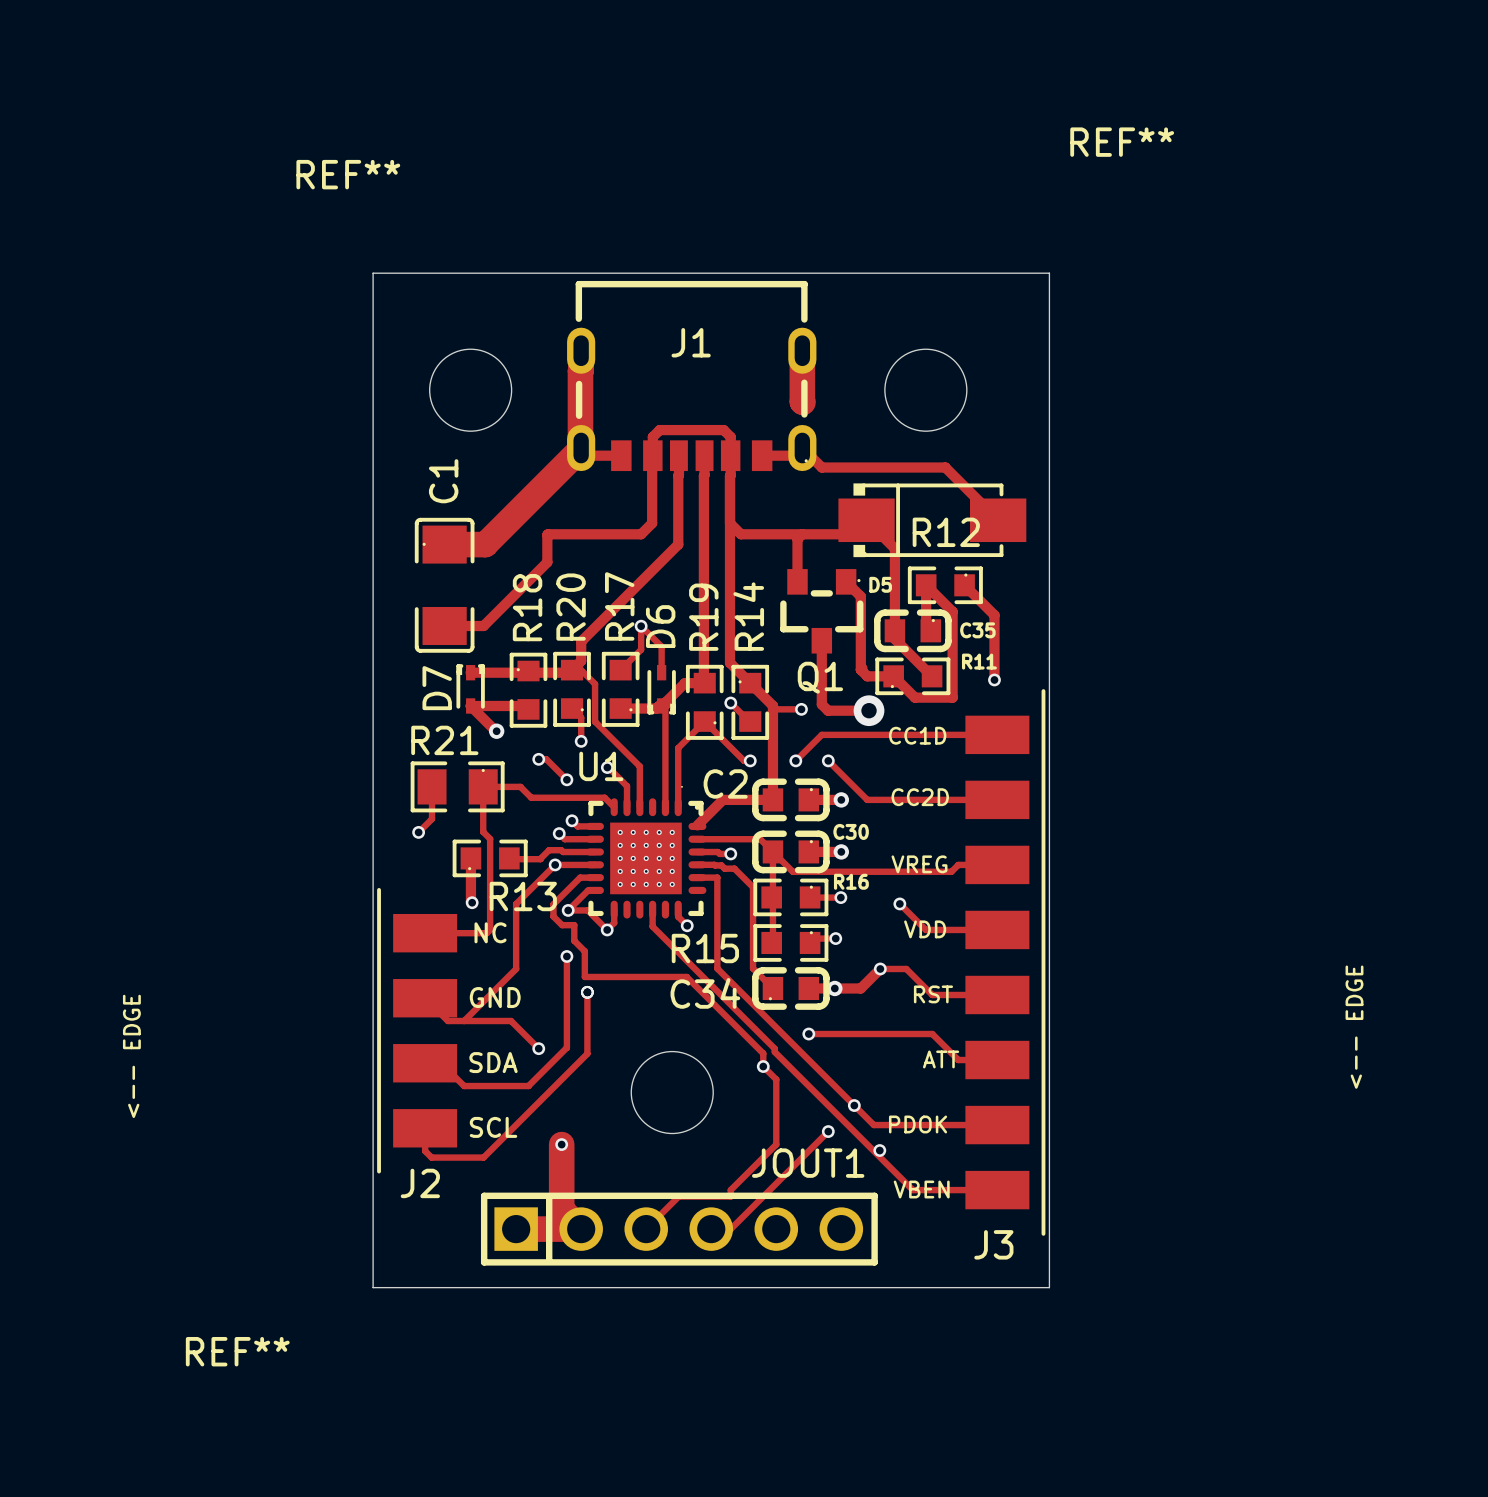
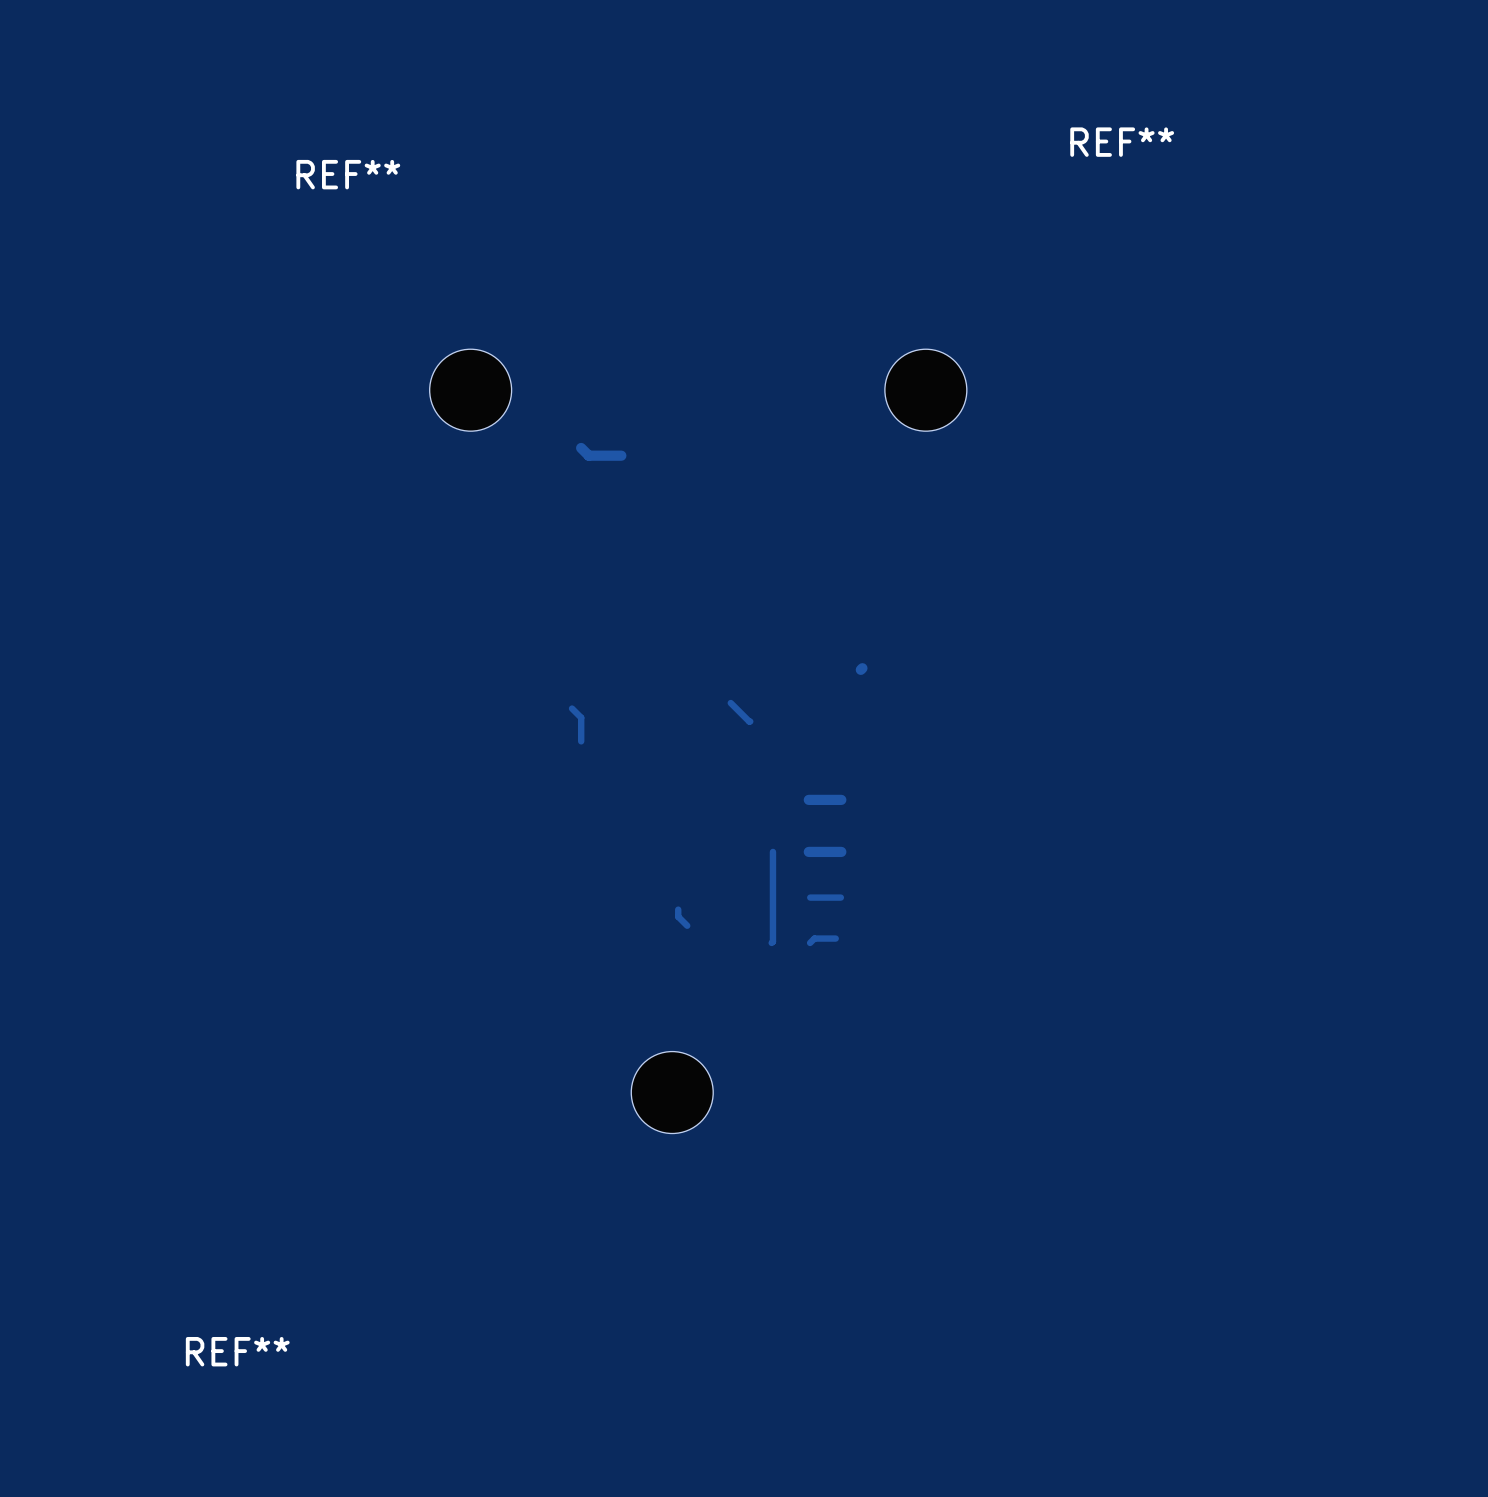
board edge: (373, 273) (1049, 273) (1049, 1287) (373, 1287) (373, 273) -> none
track: (581, 350) (580, 449) (485, 544) (444, 544) -> none
J1: (691, 376) -> none
track: (802, 402) (802, 401) (802, 350) (802, 370) (809, 377) (809, 403) -> none
track: (678, 455) (678, 544) (581, 641) (581, 660) (569, 672) (470, 672) -> none
track: (704, 455) (704, 683) (684, 683) (664, 705) (659, 705) (656, 708) (620, 708) -> none
track: (762, 455) (794, 455) (802, 448) (821, 467) (945, 467) (998, 520) -> none
D5: (932, 520) -> none
track: (730, 523) (741, 534) (859, 534) -> none
track: (802, 534) (797, 539) (797, 581) -> none
track: (860, 534) (880, 534) (894, 548) (894, 639) (932, 676) -> none
track: (846, 581) (860, 596) (860, 669) (867, 676) (893, 676) (914, 697) (952, 697) (952, 611) (926, 585) (926, 626) (930, 630) -> none
C1: (444, 585) -> none
R12: (945, 585) -> none
track: (963, 586) (994, 615) (994, 679) -> none
Q1: (821, 611) -> none
track: (444, 626) (483, 626) (547, 562) (548, 534) (641, 534) (652, 523) (652, 437) (659, 430) (723, 430) (730, 437) (730, 662) (772, 705) -> none
via: (641, 626) -> none
C35: (912, 630) -> none
track: (821, 640) (821, 704) (828, 710) (869, 710) -> none
track: (572, 670) (581, 670) (595, 684) (595, 721) (639, 766) (639, 807) -> none
track: (620, 670) (641, 649) (641, 626) (661, 646) (661, 672) -> none
R11: (912, 676) -> none
via: (994, 679) -> none
D7: (470, 688) -> none
R20: (572, 689) -> none
R17: (620, 689) -> none
D6: (661, 689) -> none
R18: (528, 690) -> none
R19: (704, 702) -> none
R14: (750, 702) -> none
via: (730, 703) -> none
track: (772, 705) (772, 799) (722, 799) (697, 825) -> none
track: (772, 705) (776, 709) (801, 709) -> none
track: (665, 706) (665, 807) -> none
track: (528, 709) (525, 705) (470, 705) (496, 731) -> none
via: (801, 709) -> none
via: (869, 710) -> none
via: (496, 731) -> none
track: (997, 734) (821, 734) (795, 760) -> none
via: (581, 741) -> none
track: (538, 759) (546, 759) (566, 779) -> none
via: (538, 759) -> none
track: (750, 760) (744, 760) (704, 721) (678, 748) (678, 807) -> none
via: (750, 760) -> none
via: (795, 760) -> none
track: (828, 760) (867, 799) (997, 799) -> none
via: (828, 760) -> none
track: (607, 767) (627, 786) (627, 807) -> none
via: (607, 767) -> none
via: (566, 779) -> none
track: (432, 786) (432, 818) (418, 832) -> none
R21: (457, 786) -> none
C2: (790, 799) -> none
via: (841, 799) -> none
track: (614, 807) (604, 797) (531, 797) (520, 786) (483, 786) (483, 832) (490, 838) (490, 929) (486, 933) (425, 933) -> none
track: (572, 820) (577, 826) (595, 826) -> none
via: (572, 820) -> none
via: (418, 832) -> none
via: (620, 832) -> none
via: (633, 832) -> none
via: (646, 832) -> none
via: (659, 832) -> none
via: (672, 832) -> none
track: (559, 833) (564, 839) (595, 839) -> none
via: (559, 833) -> none
track: (697, 839) (760, 839) (792, 871) (951, 871) (958, 864) (997, 864) -> none
via: (620, 845) -> none
via: (633, 845) -> none
via: (646, 845) -> none
via: (659, 845) -> none
via: (672, 845) -> none
C30: (790, 851) -> none
via: (841, 851) -> none
track: (595, 852) (549, 850) (540, 858) -> none
U1: (646, 852) -> none
track: (697, 852) (730, 853) -> none
via: (730, 853) -> none
track: (470, 858) (472, 902) -> none
R13: (490, 858) -> none
track: (509, 858) (540, 859) -> none
via: (620, 858) -> none
via: (633, 858) -> none
via: (646, 858) -> none
via: (659, 858) -> none
via: (672, 858) -> none
via: (555, 864) -> none
track: (594, 864) (555, 864) (516, 903) (516, 968) (464, 1021) -> none
track: (697, 864) (721, 865) (724, 868) (734, 868) (753, 887) (753, 968) (772, 988) -> none
via: (620, 871) -> none
via: (633, 871) -> none
via: (646, 871) -> none
via: (659, 871) -> none
via: (672, 871) -> none
track: (595, 877) (580, 877) (553, 904) (553, 916) (562, 925) (574, 925) (574, 940) (584, 951) (584, 976) (686, 976) (763, 1053) (763, 1066) (776, 1079) (776, 1144) (730, 1190) (730, 1196) (678, 1196) (646, 1229) -> none
track: (697, 877) (717, 877) (717, 968) (873, 1125) (997, 1125) -> none
via: (620, 884) -> none
via: (633, 884) -> none
via: (646, 884) -> none
via: (659, 884) -> none
via: (672, 884) -> none
track: (595, 890) (588, 890) (568, 910) (587, 910) (607, 929) (614, 922) (614, 909) -> none
R16: (790, 897) -> none
via: (840, 897) -> none
via: (472, 902) -> none
track: (899, 903) (925, 929) (997, 929) -> none
via: (899, 903) -> none
track: (652, 909) (652, 926) (912, 1190) (997, 1190) -> none
via: (568, 910) -> none
via: (687, 925) -> none
via: (607, 929) -> none
via: (835, 938) -> none
R15: (790, 942) -> none
track: (566, 956) (566, 1047) (528, 1086) (464, 1086) (441, 1063) (425, 1063) -> none
via: (566, 956) -> none
J3: (1005, 962) -> none
via: (880, 968) -> none
C34: (790, 988) -> none
track: (808, 988) (860, 988) (880, 968) (906, 968) (932, 994) (997, 994) -> none
via: (834, 988) -> none
track: (587, 992) (587, 1053) (483, 1157) (431, 1157) (425, 1151) (425, 1128) -> none
via: (587, 992) -> none
track: (425, 998) (447, 1021) (511, 1021) (538, 1048) -> none
J2: (417, 1030) -> none
track: (808, 1034) (932, 1034) (958, 1060) (997, 1060) -> none
via: (808, 1034) -> none
via: (538, 1048) -> none
via: (763, 1066) -> none
via: (854, 1105) -> none
track: (828, 1131) (730, 1229) (711, 1229) -> none
via: (828, 1131) -> none
track: (561, 1144) (561, 1209) (581, 1229) (516, 1229) -> none
via: (561, 1144) -> none
via: (879, 1150) -> none
JOUT1: (679, 1229) -> none

